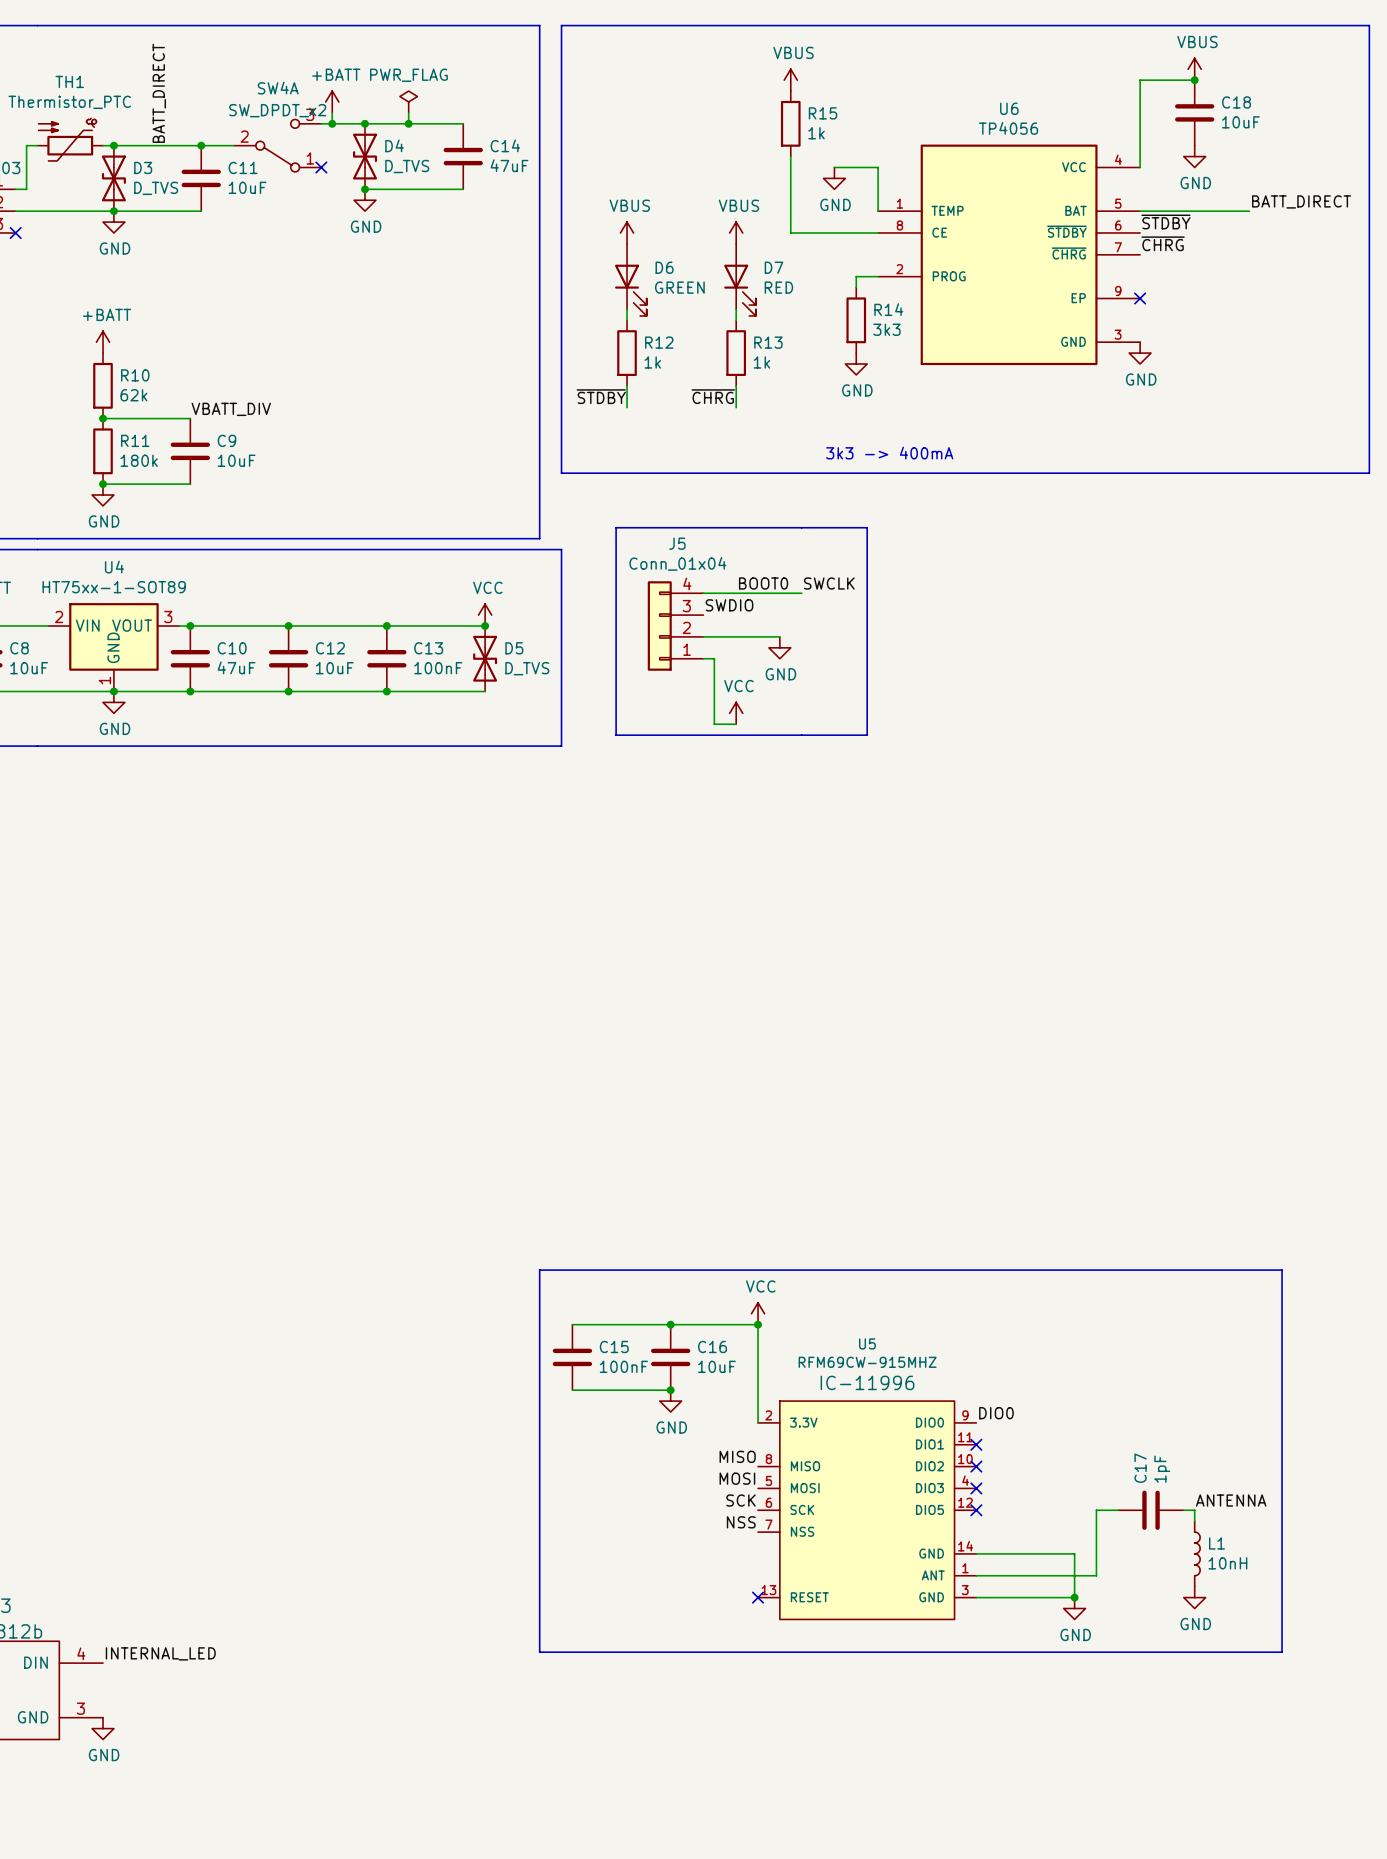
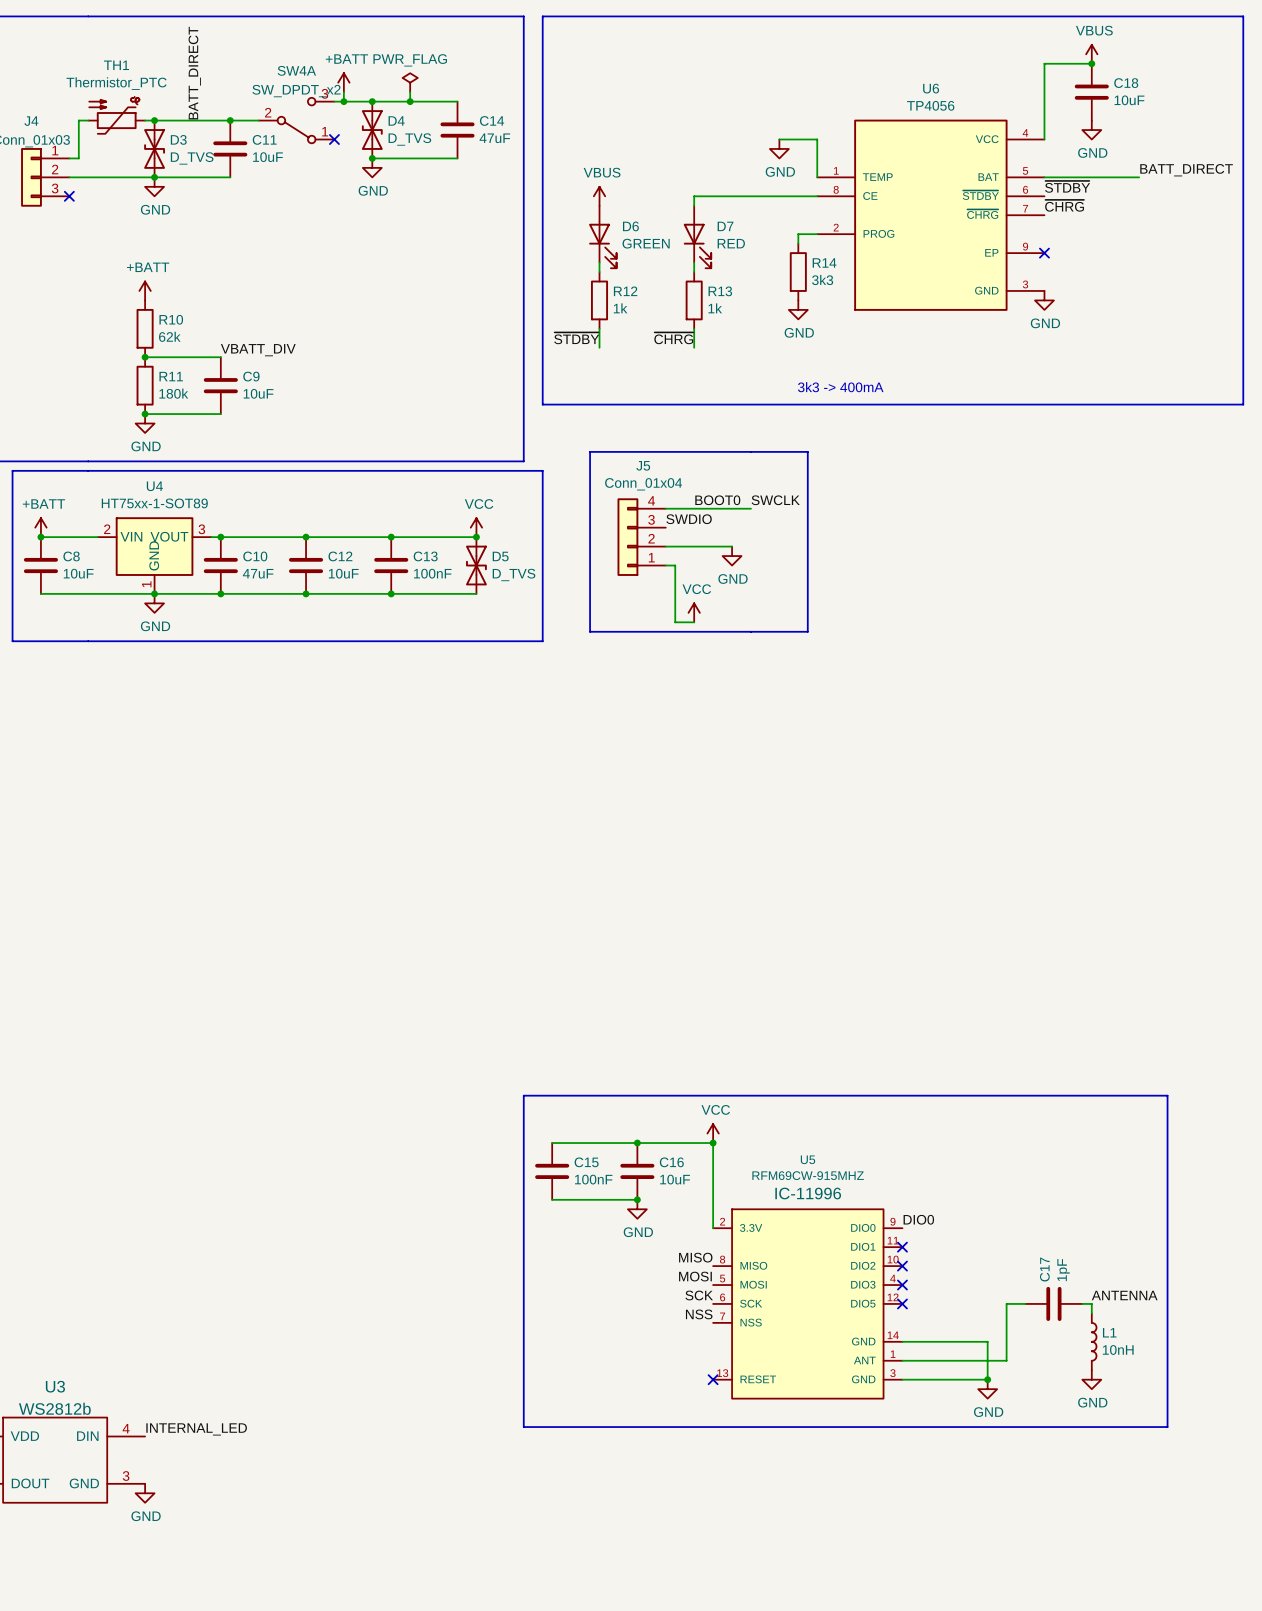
power symbol: VBUS (790, 80) -> none
R15: 1k (790, 123) -> none
wire: (790, 156) (790, 233) -> (694, 205) (694, 196) (741, 196)
power symbol: VBUS (736, 233) -> none

